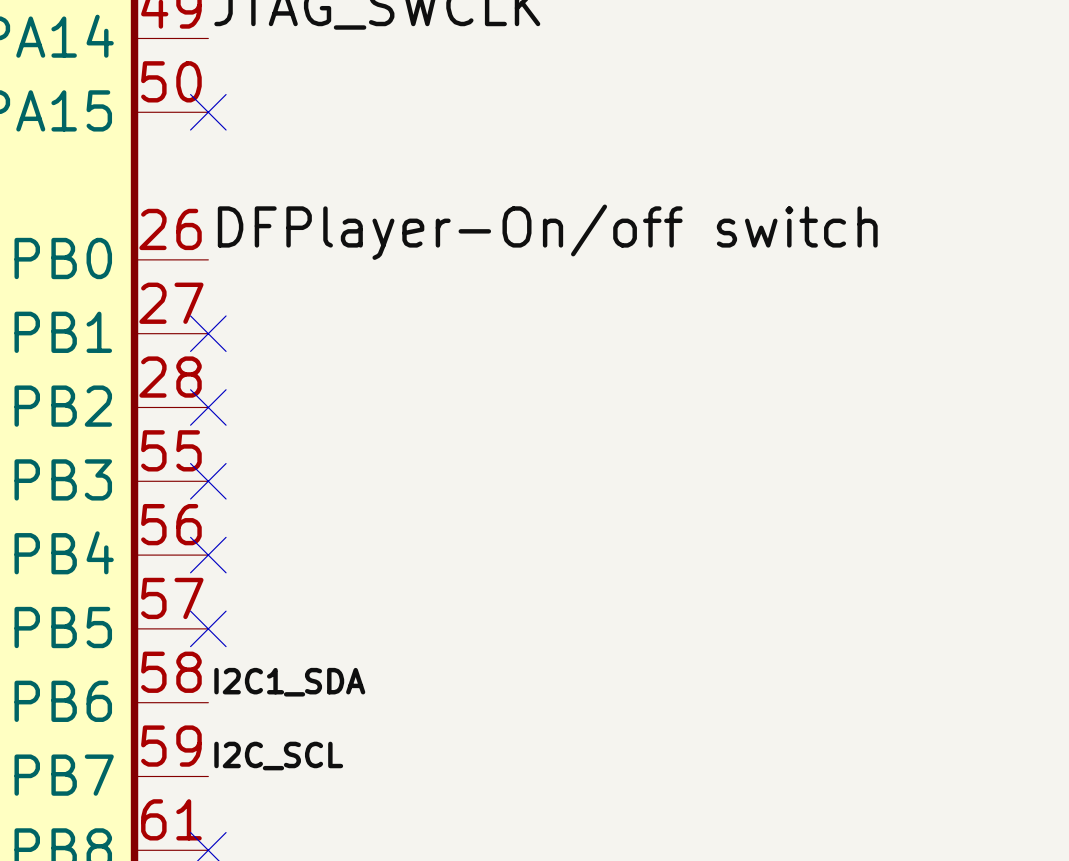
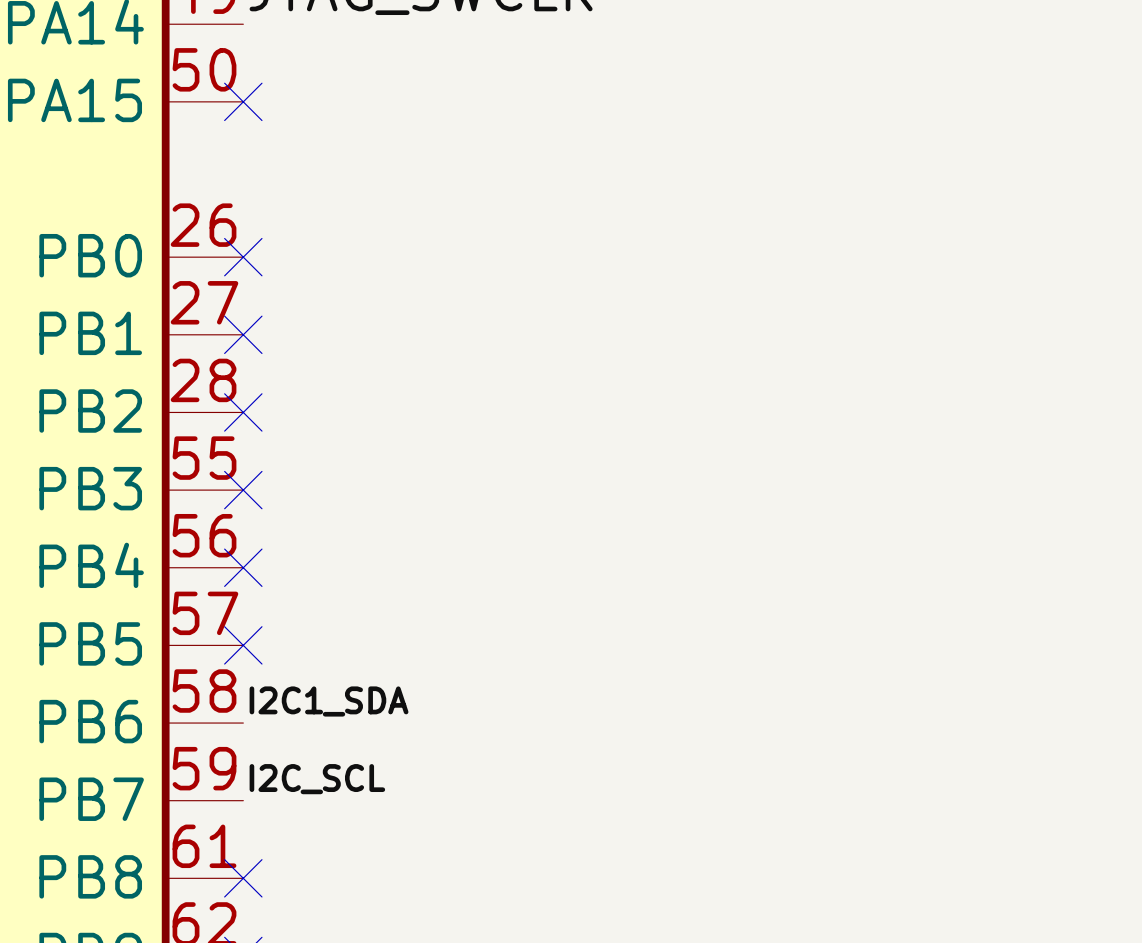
label: DFPlayer-On/off switch (547, 232) -> none
no-connect mark: none -> (243, 257)

